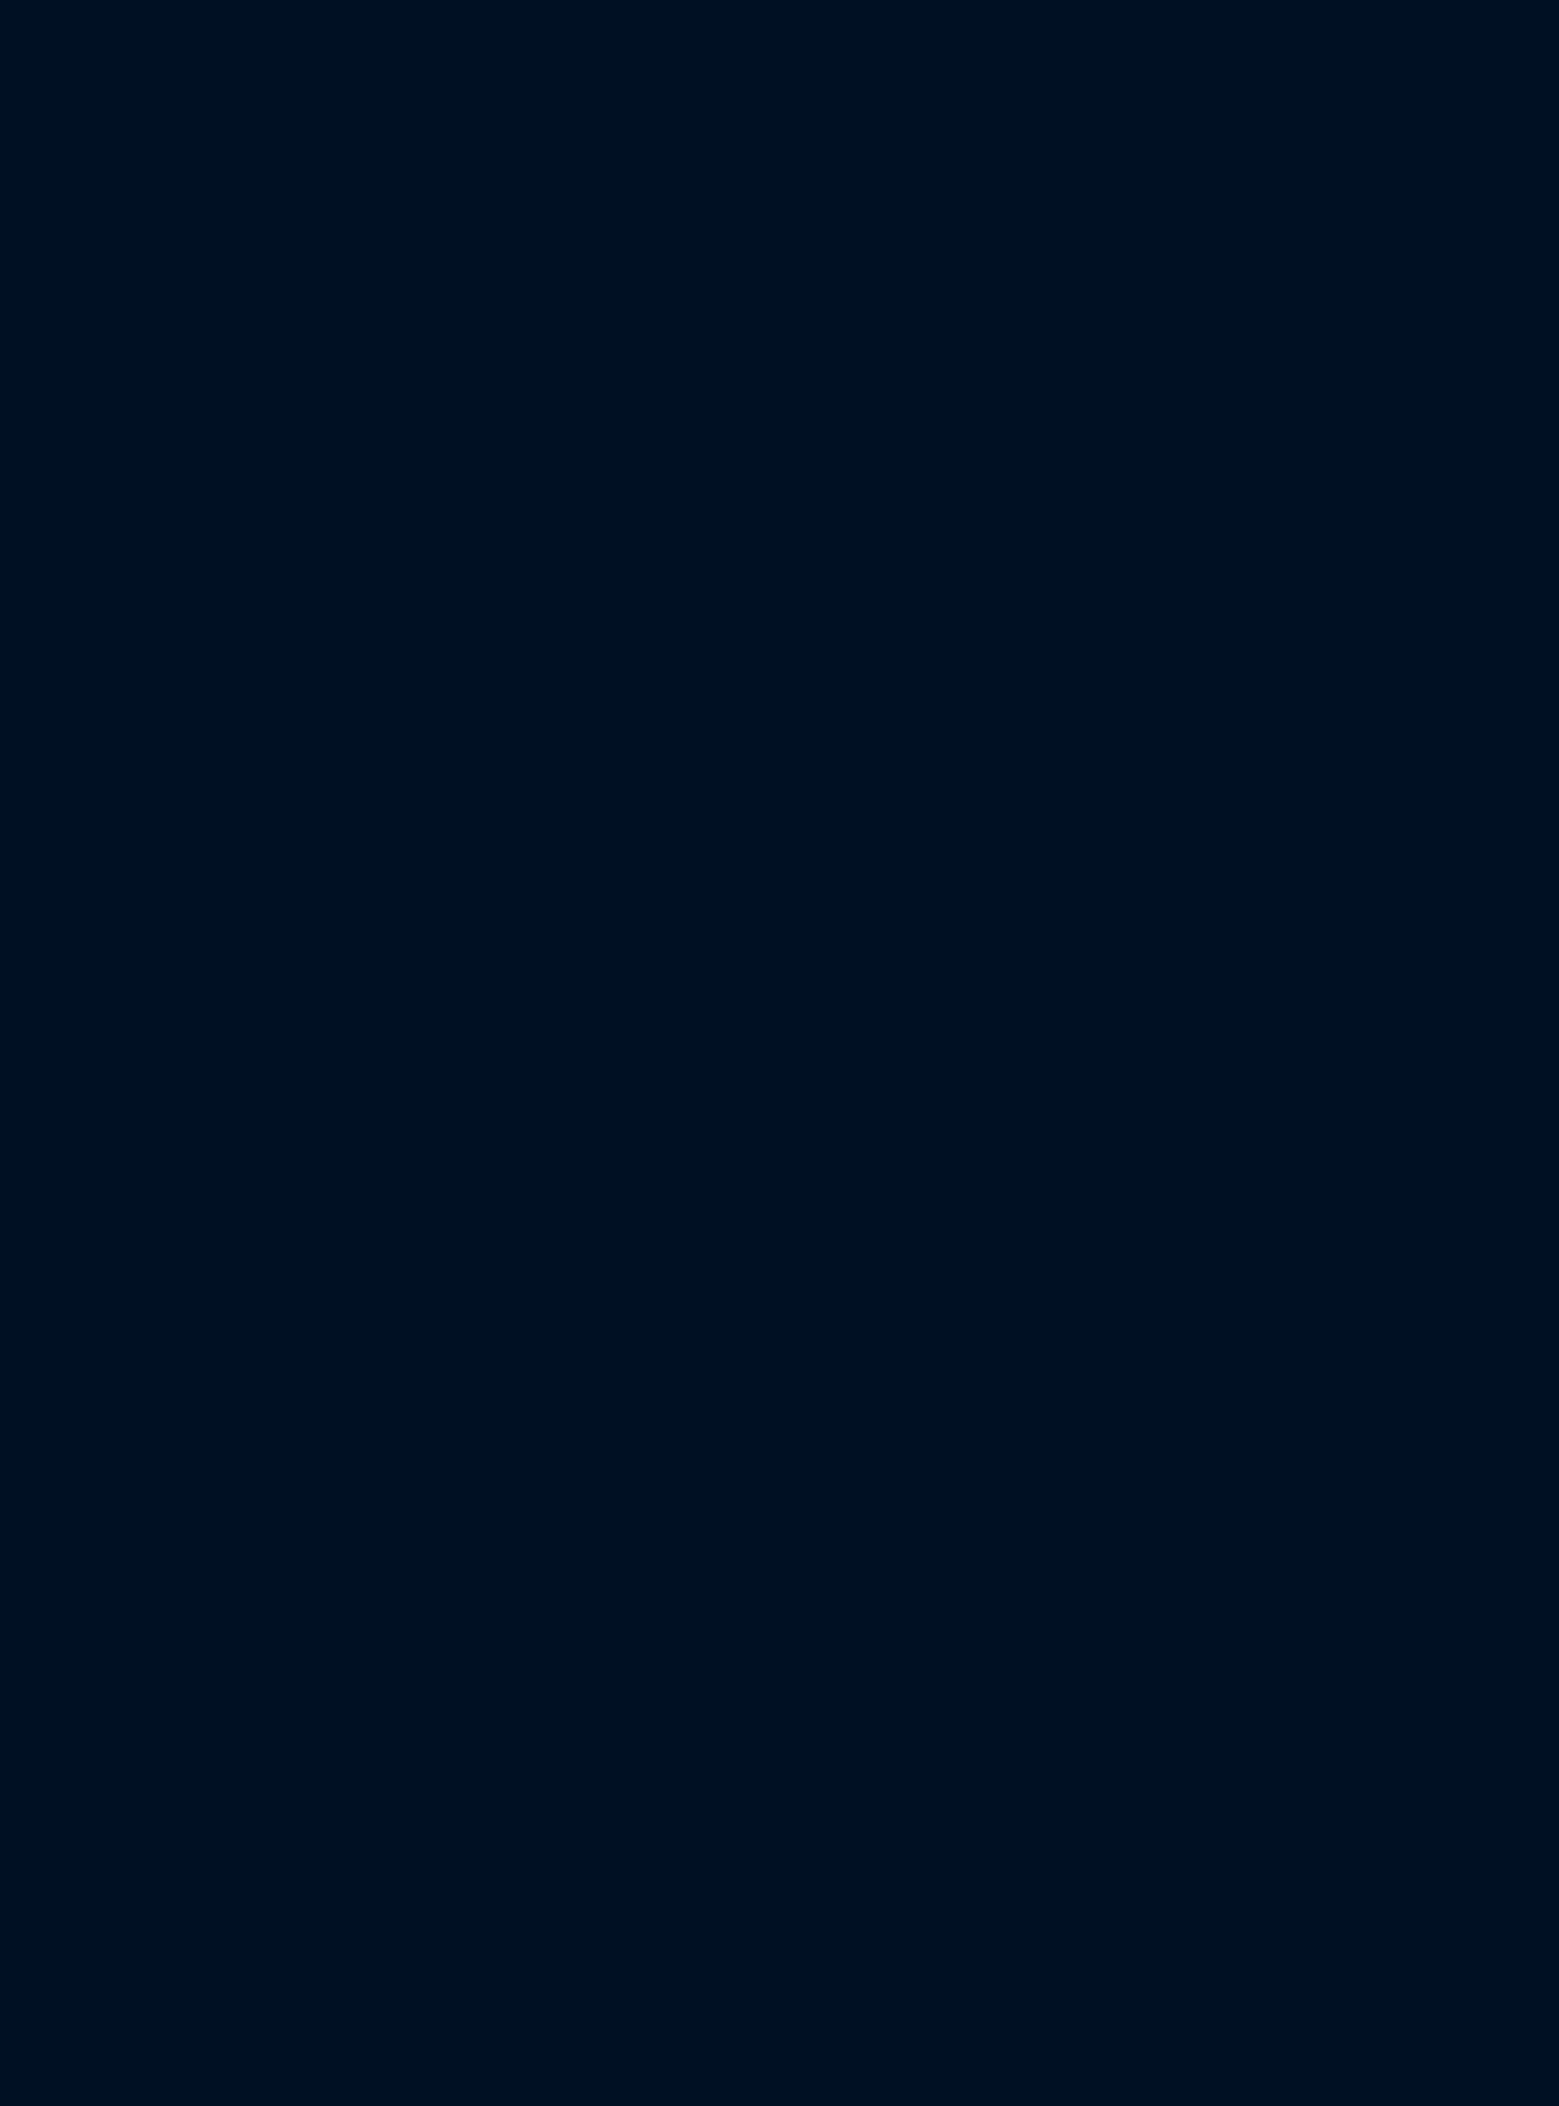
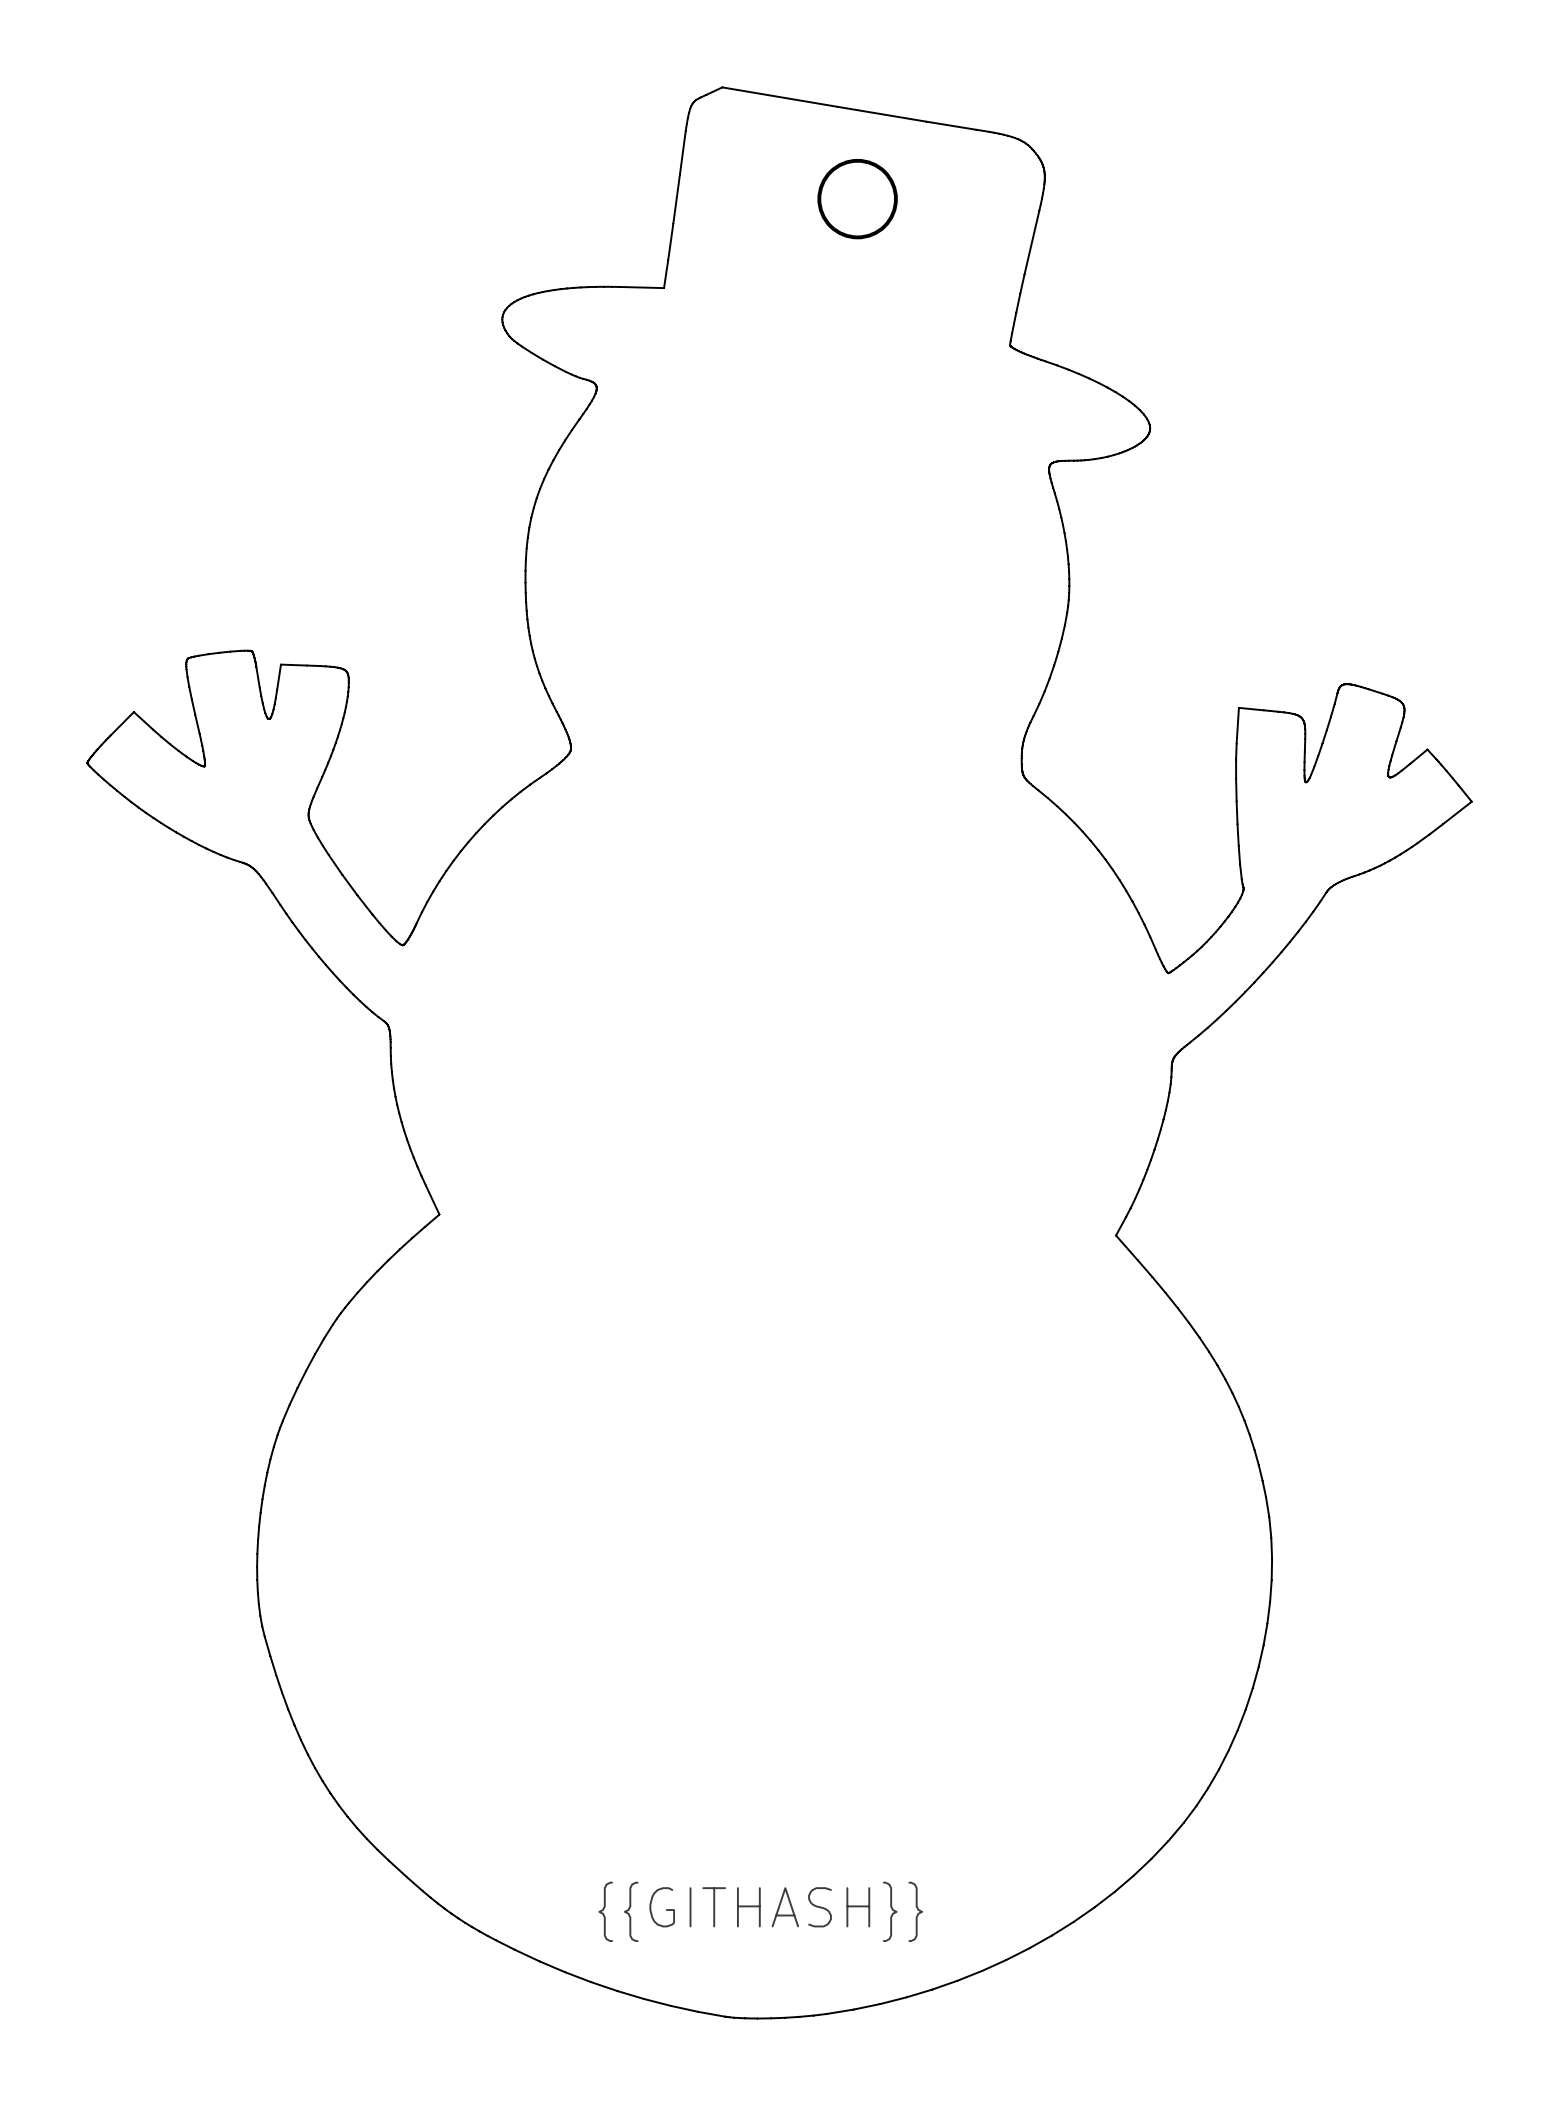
round board edge: none -> [817, 158, 898, 240]
board edge: none -> (1010, 344) (1044, 182) (1041, 163) (1027, 145) (1015, 138) (994, 132) (722, 87) (694, 101) (690, 109) (686, 123) (664, 288) (595, 286) (548, 290) (517, 300) (507, 308) (503, 314) (504, 327) (514, 340) (554, 366) (592, 382) (596, 387) (592, 400) (559, 450) (544, 479) (533, 507) (526, 548) (526, 601) (531, 643) (539, 673) (566, 732) (570, 749) (559, 763) (502, 807) (468, 842) (439, 881) (403, 944)
board edge: none -> (1010, 345) (1021, 352) (1079, 374) (1107, 387) (1135, 405) (1143, 414) (1149, 424) (1149, 431) (1145, 438) (1125, 451) (1094, 459) (1056, 461) (1049, 466) (1049, 474) (1061, 517) (1067, 548) (1068, 599) (1064, 625) (1054, 665) (1024, 738) (1021, 764) (1022, 773) (1026, 780) (1074, 822) (1112, 869) (1138, 913) (1168, 973)
board edge: none -> (251, 651) (219, 652) (187, 659) (187, 677) (205, 765)
board edge: none -> (252, 651) (264, 708) (268, 719) (273, 709) (280, 664) (334, 667) (342, 669) (347, 673) (348, 691) (343, 718) (333, 749) (310, 803) (308, 818) (322, 845) (357, 895) (385, 930) (402, 945)
board edge: none -> (87, 762) (101, 744) (133, 712) (178, 750) (204, 766)
board edge: none -> (87, 762) (117, 790) (161, 822) (206, 848) (252, 867) (325, 965) (359, 1001) (386, 1023) (390, 1034) (394, 1088) (401, 1122) (417, 1166) (439, 1214) (377, 1271) (348, 1303) (332, 1324) (315, 1354) (289, 1404) (277, 1435) (267, 1472) (260, 1512) (257, 1553) (260, 1615) (282, 1692) (301, 1740) (315, 1767) (338, 1805) (377, 1849) (437, 1903) (479, 1931) (539, 1961) (617, 1991) (698, 2011) (729, 2017) (757, 2018) (826, 2013) (906, 1997) (982, 1970) (1052, 1935) (1114, 1891) (1168, 1841) (1208, 1788) (1237, 1730) (1258, 1667) (1270, 1601) (1271, 1537) (1266, 1497) (1258, 1464) (1238, 1406) (1208, 1351) (1165, 1292) (1116, 1235) (1139, 1189) (1154, 1149) (1165, 1110) (1172, 1062) (1175, 1055) (1226, 1010) (1263, 972) (1298, 931) (1330, 888) (1400, 854) (1471, 801) (1427, 749) (1398, 773) (1389, 777) (1389, 765) (1403, 715) (1403, 705) (1392, 697) (1350, 684) (1342, 684) (1338, 688) (1318, 756) (1306, 782)
board edge: none -> (1305, 781) (1305, 729) (1301, 717) (1289, 713) (1238, 707) (1236, 759) (1236, 801) (1243, 891) (1232, 911) (1211, 937) (1192, 955) (1168, 973)
text: none -> {{GITHASH}} (760, 1911)

